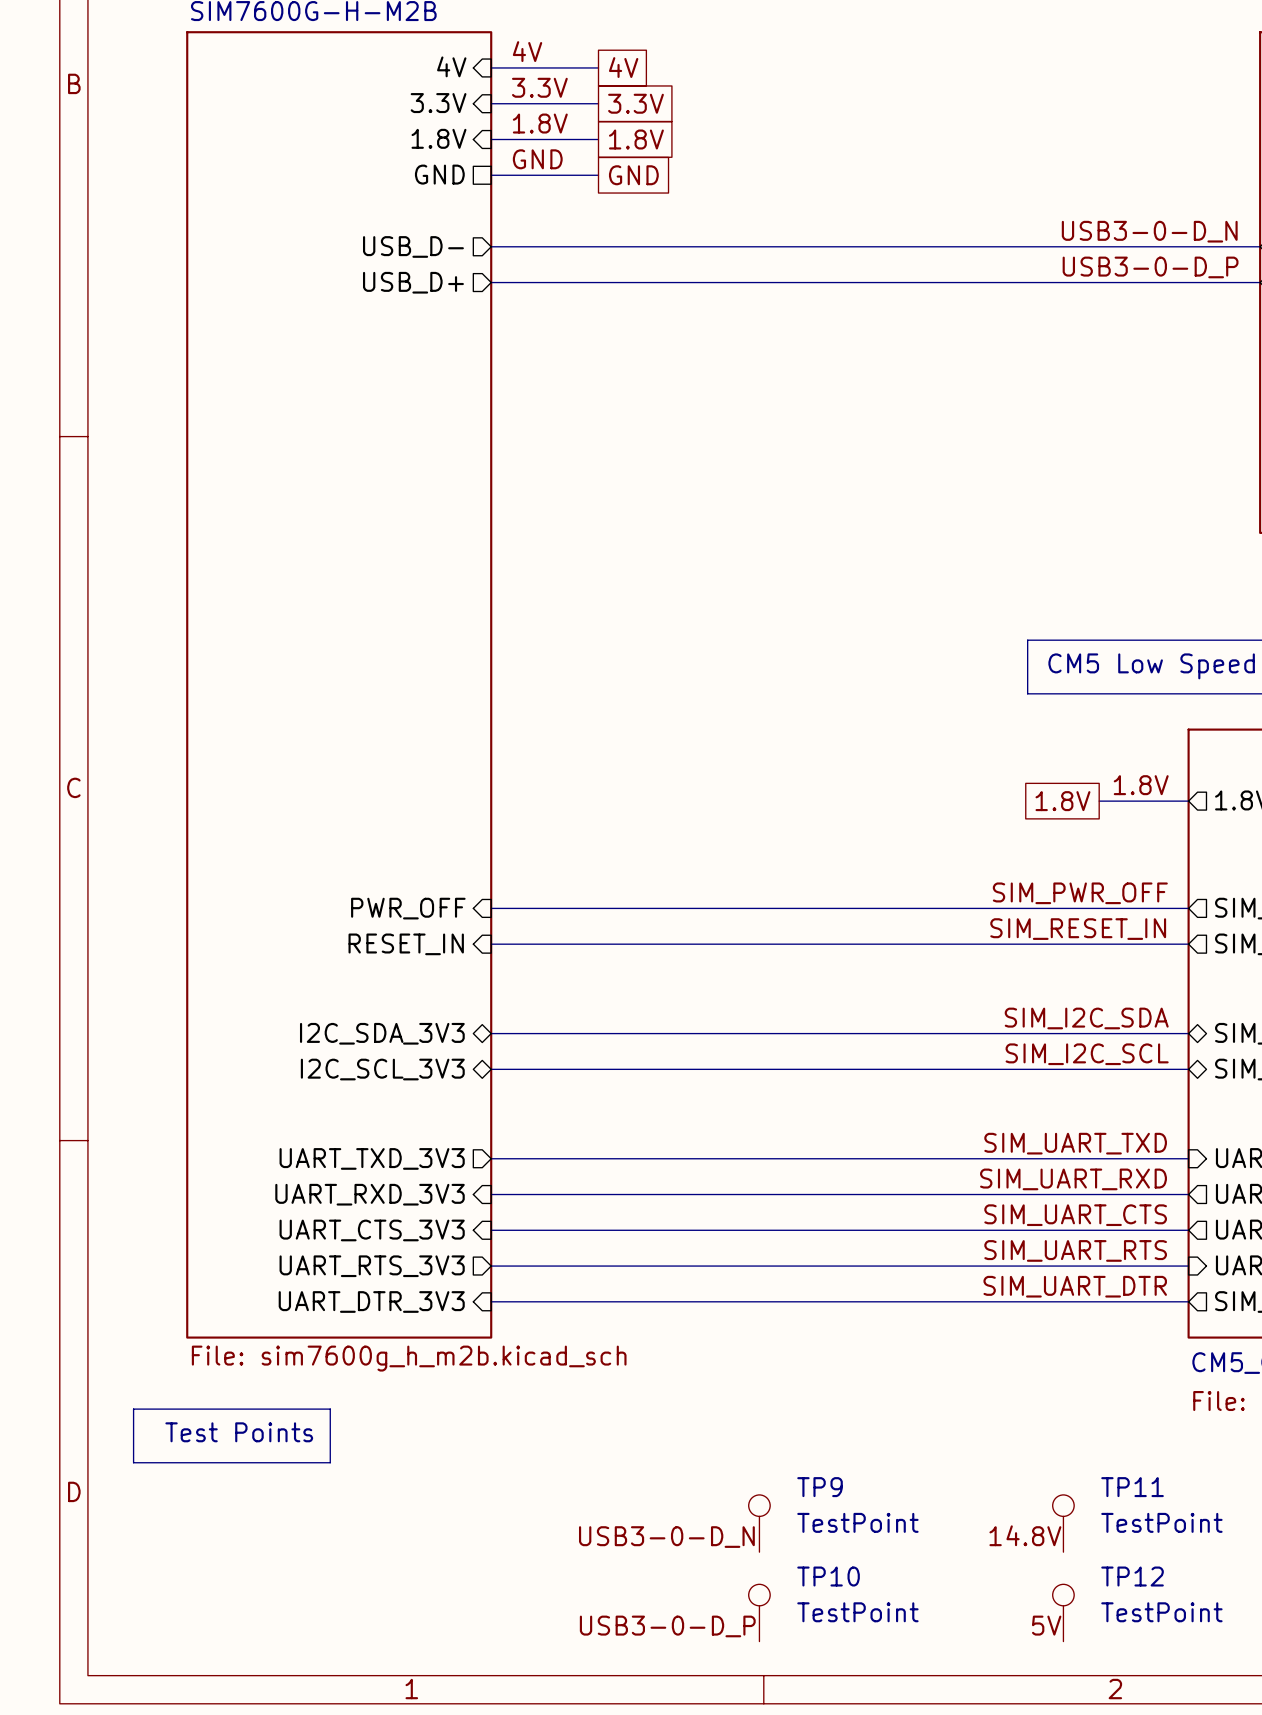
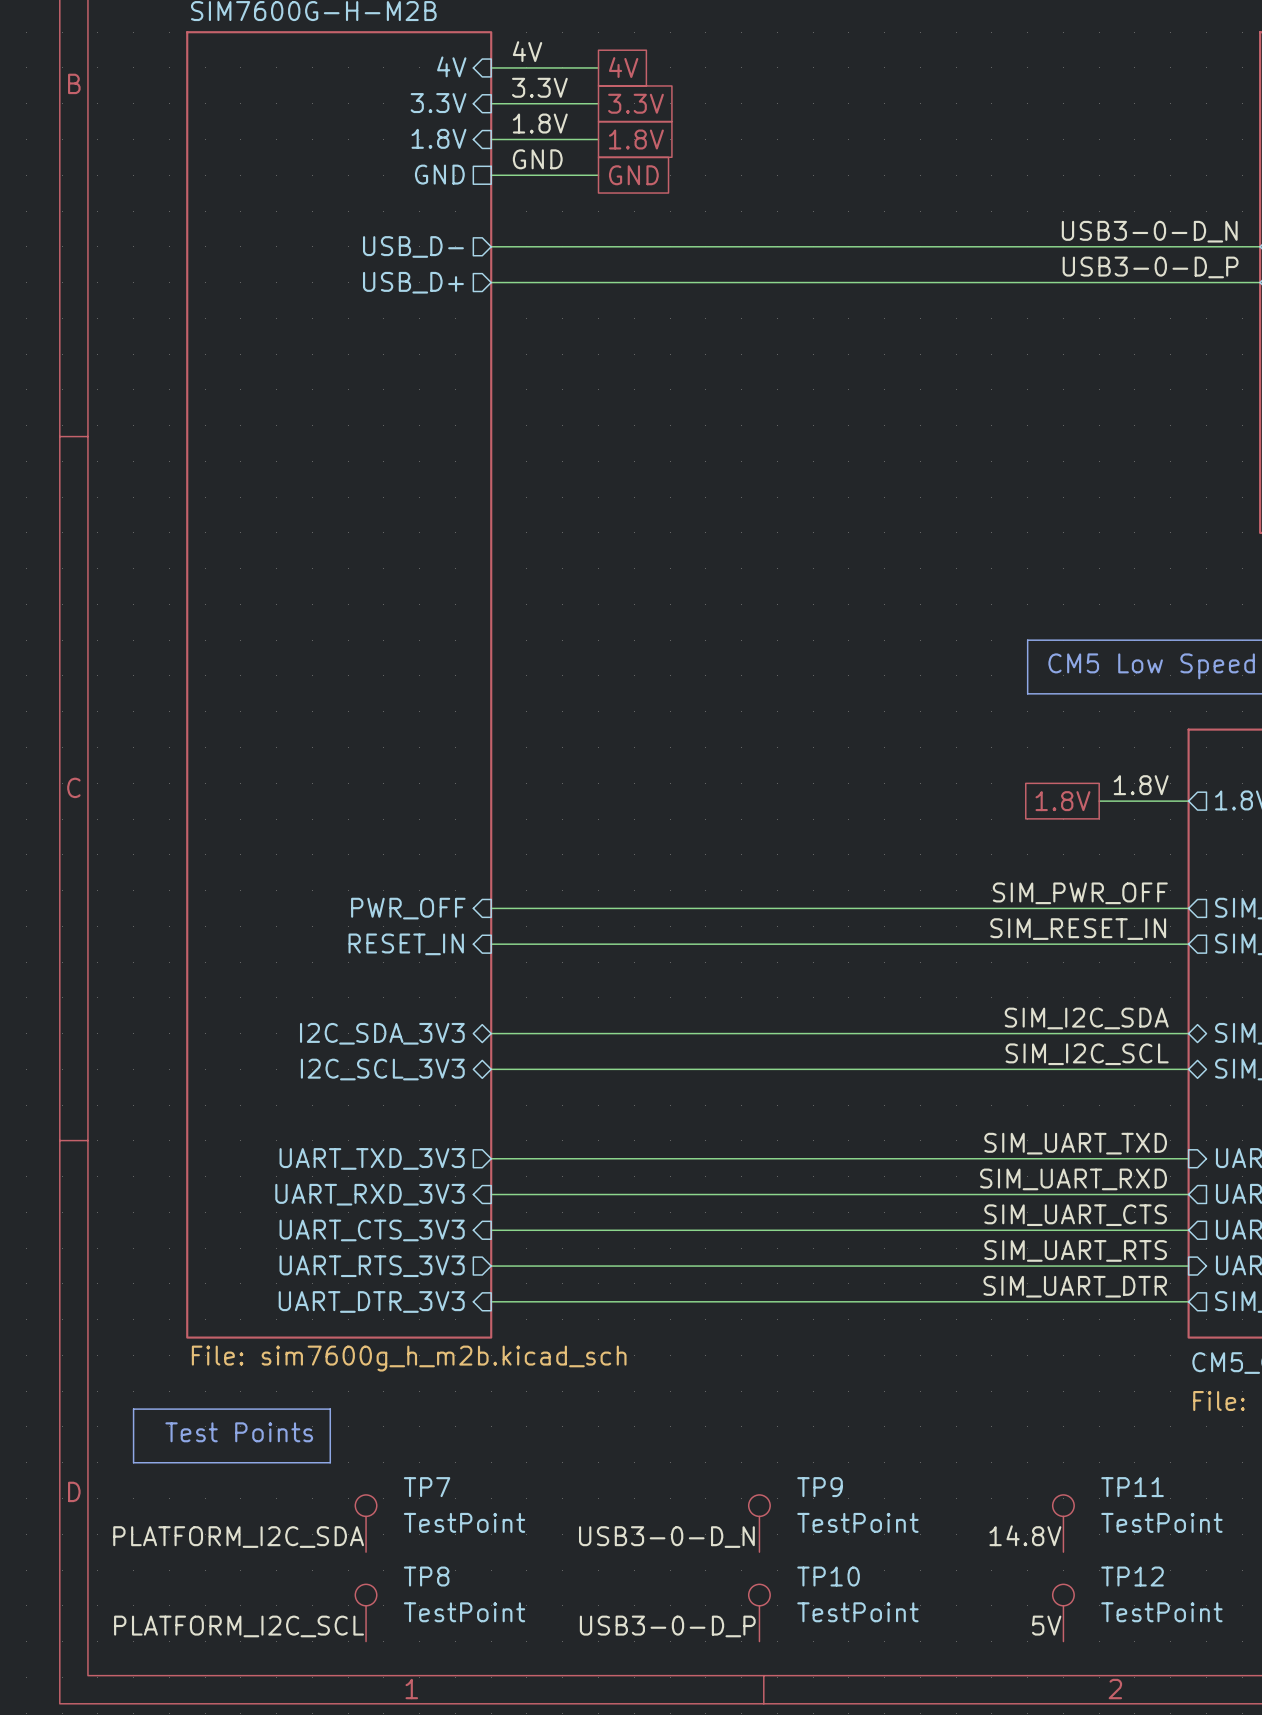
TP7: none -> TestPoint (366, 1523)
label: none -> PLATFORM_I2C_SDA (238, 1537)
TP8: none -> TestPoint (366, 1612)
label: none -> PLATFORM_I2C_SCL (239, 1626)

